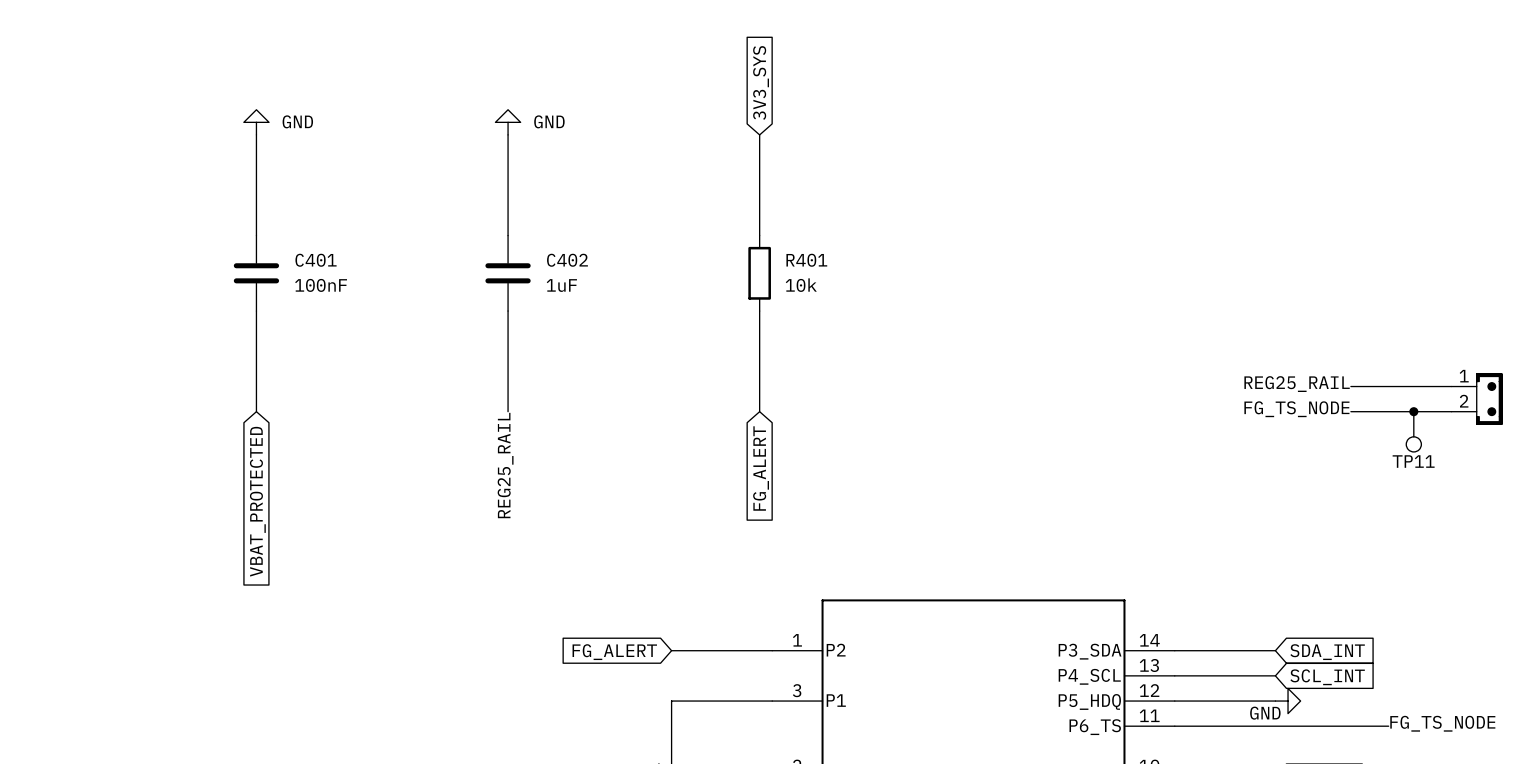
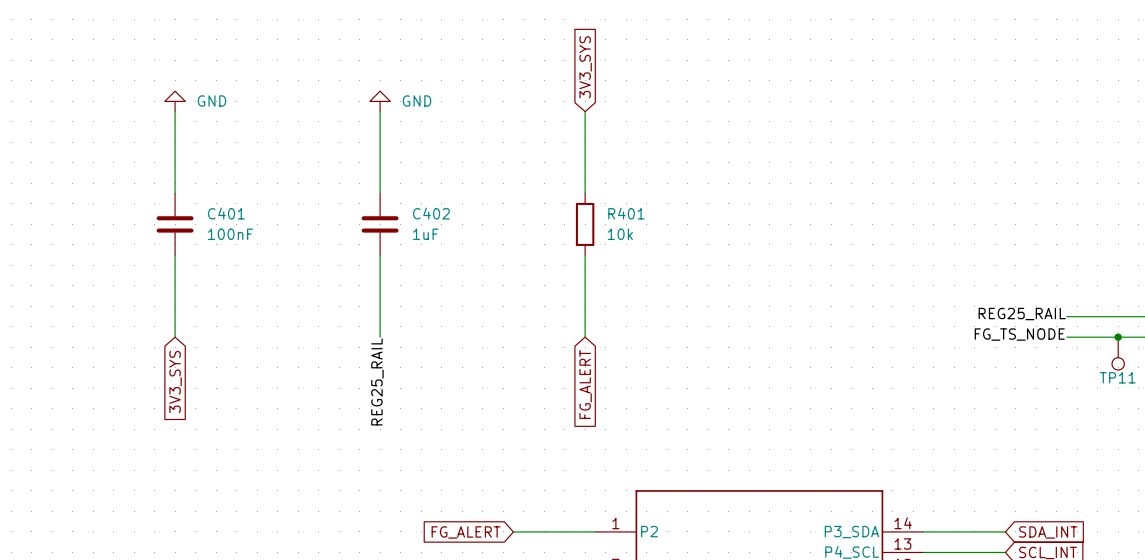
global label: VBAT_PROTECTED (257, 501) -> 3V3_SYS (175, 381)

